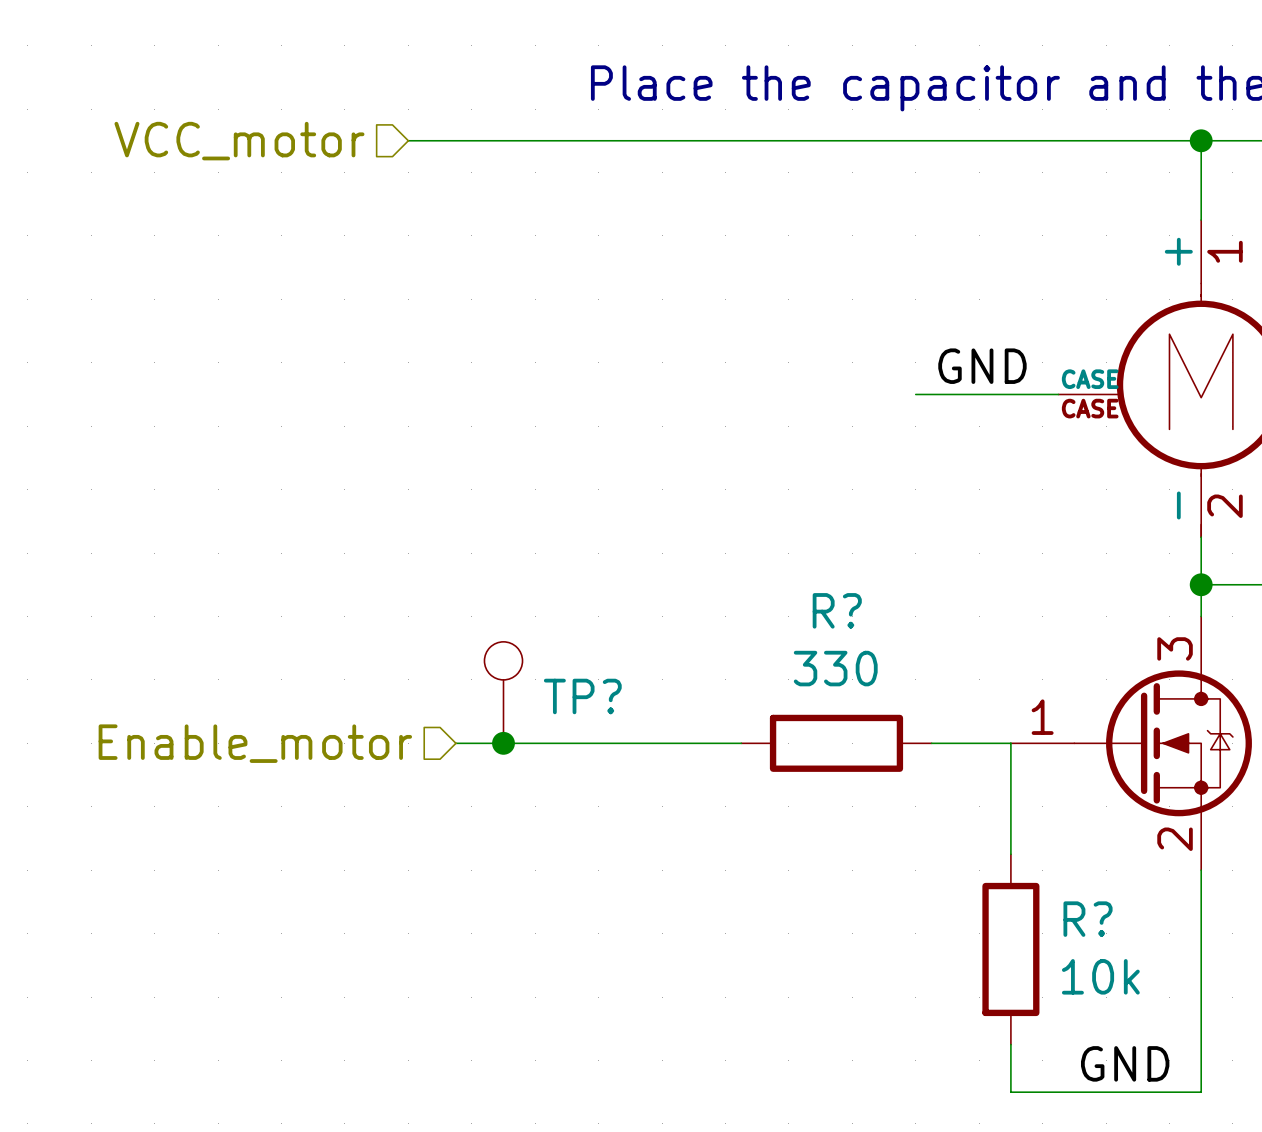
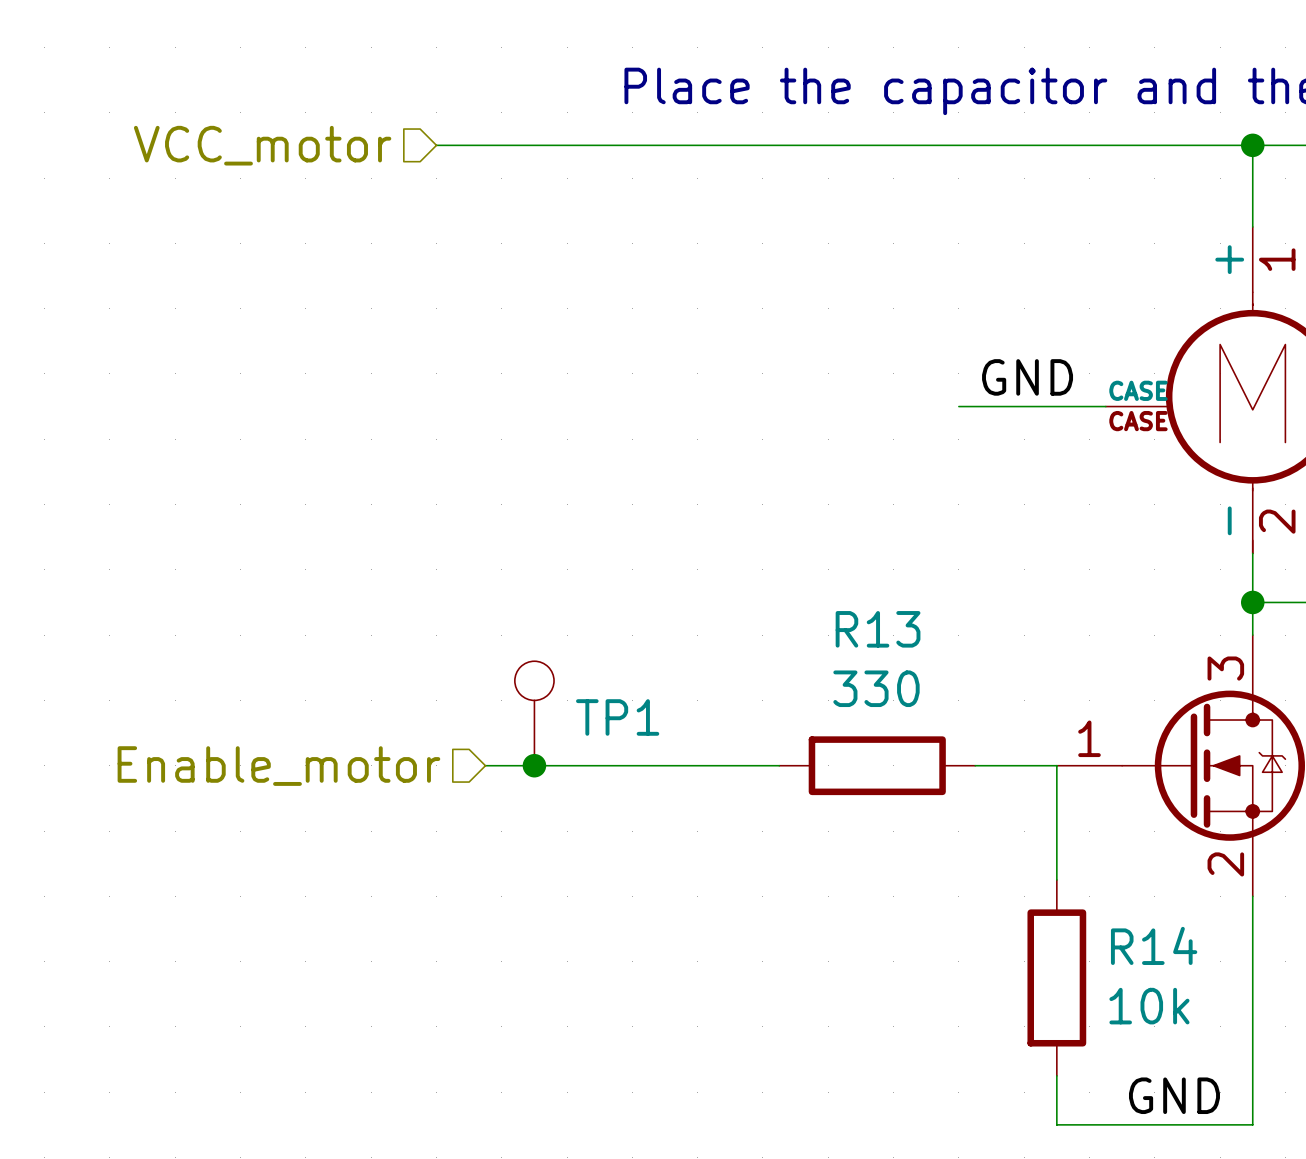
R? name: R? (837, 610) -> R13 (878, 629)
TP? name: TP? (582, 696) -> TP1 (617, 717)
R? name: R? (1088, 919) -> R14 (1154, 945)

